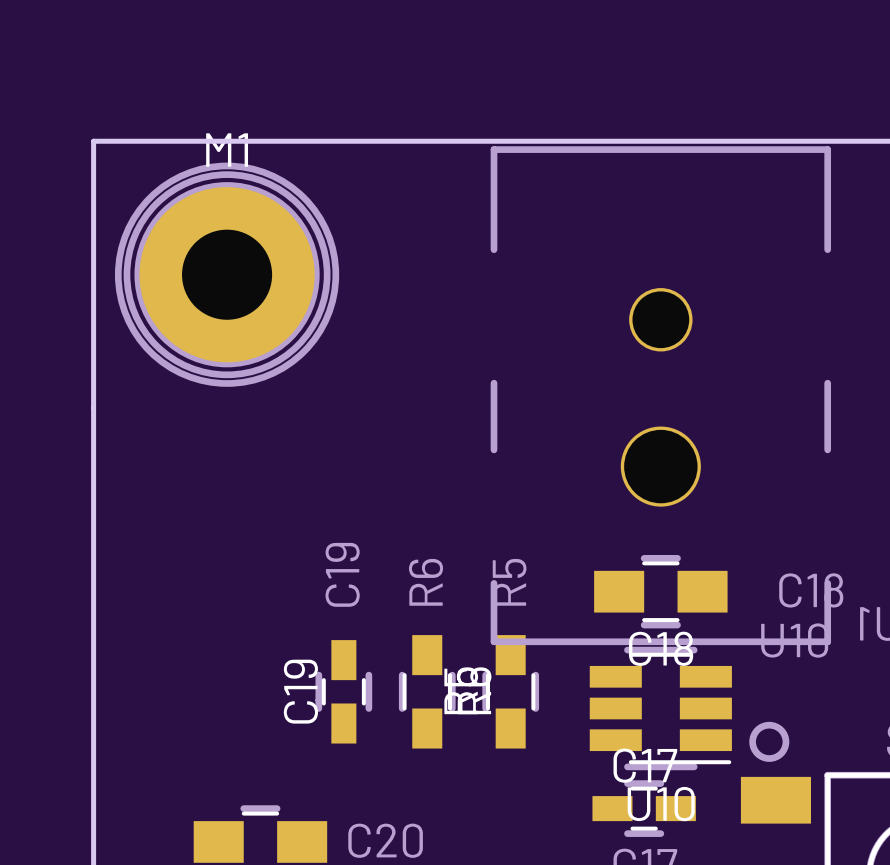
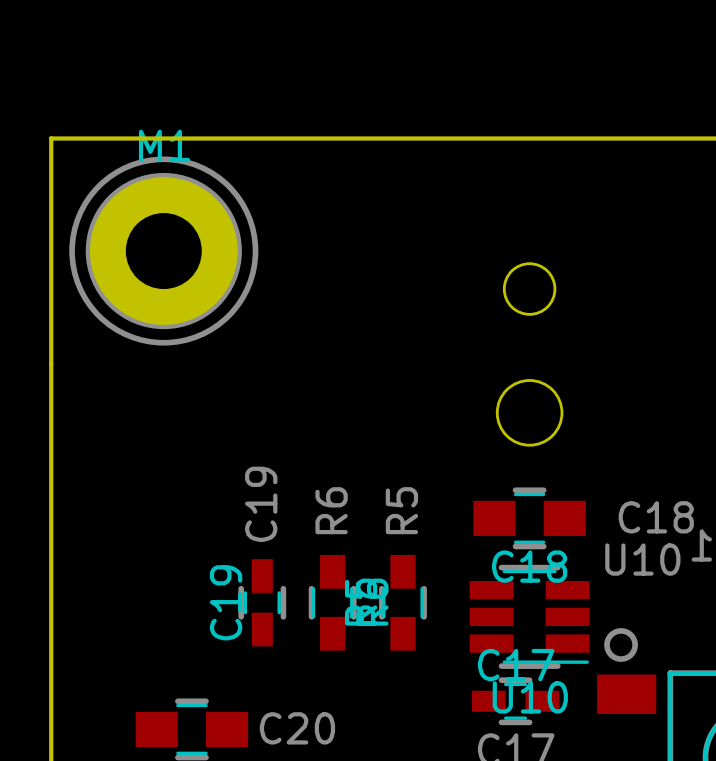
drawing: [123, 171, 331, 379] -> none
line: (494, 249) (494, 149) (827, 149) (827, 249) -> none
line: (494, 383) (494, 449) -> none
line: (827, 383) (827, 449) -> none
line: (494, 583) (494, 641) (827, 641) (827, 583) -> none

